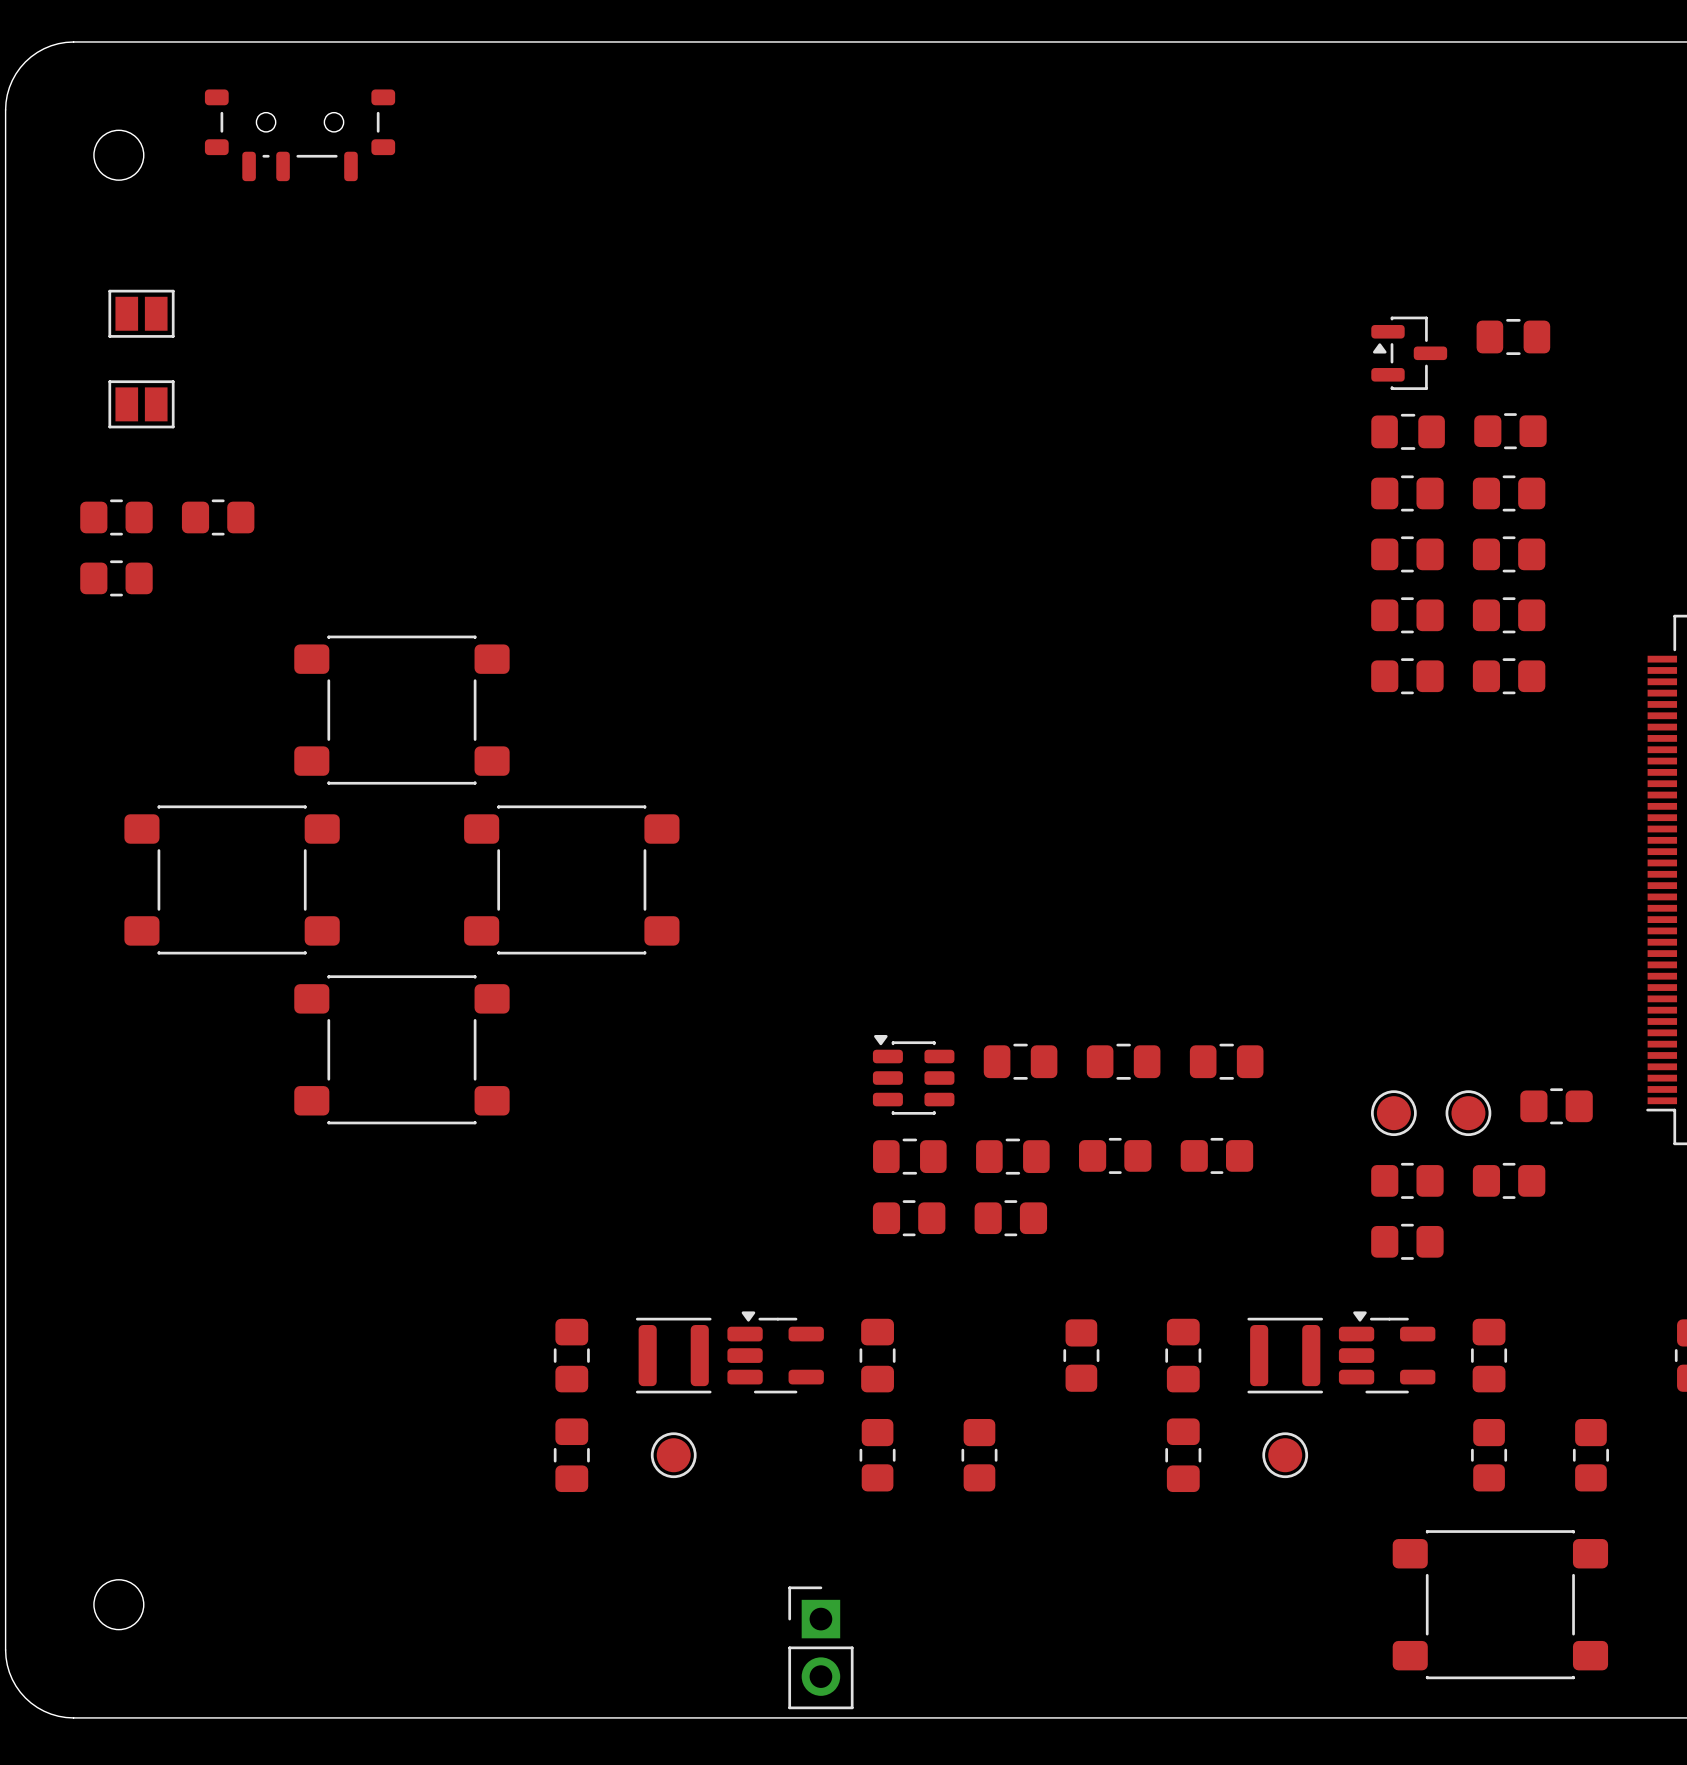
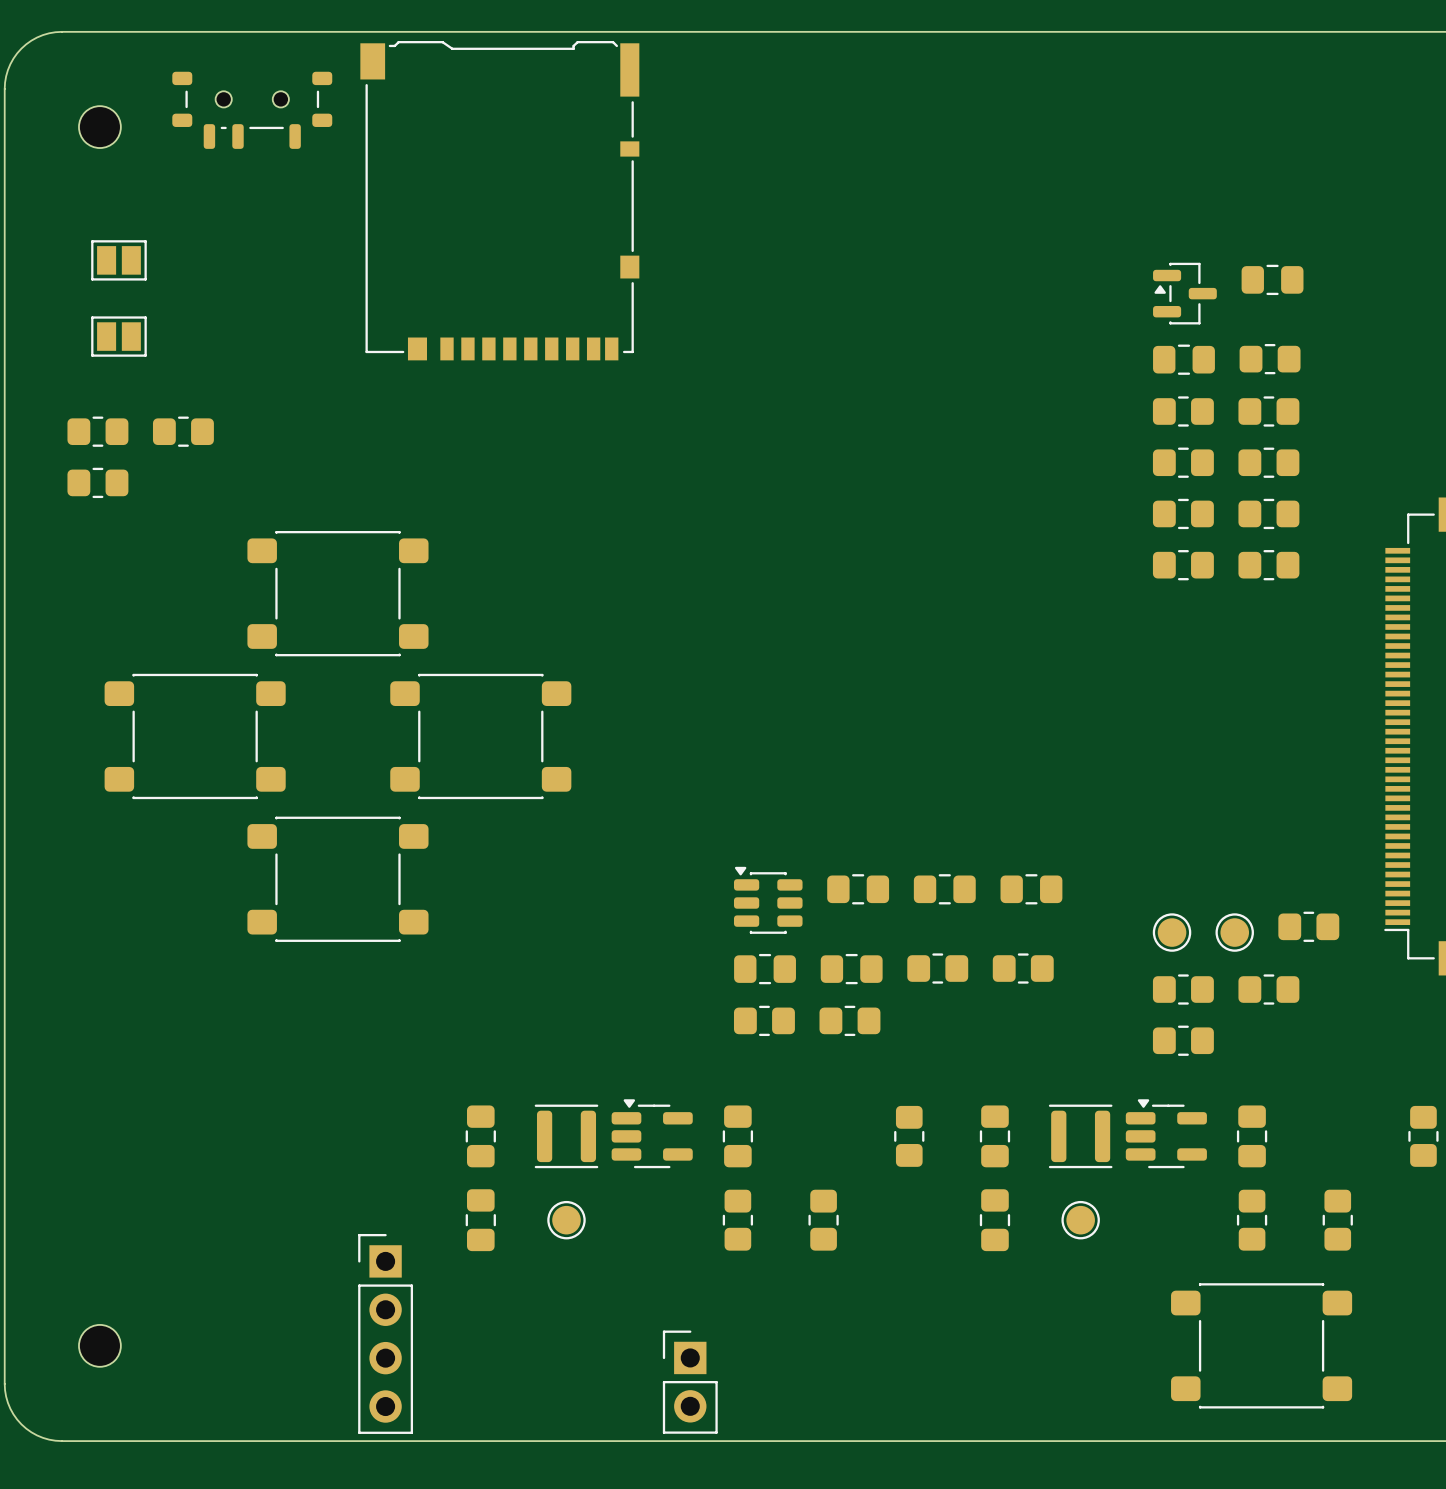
part: none -> (499, 200)
part: none -> (385, 1333)

